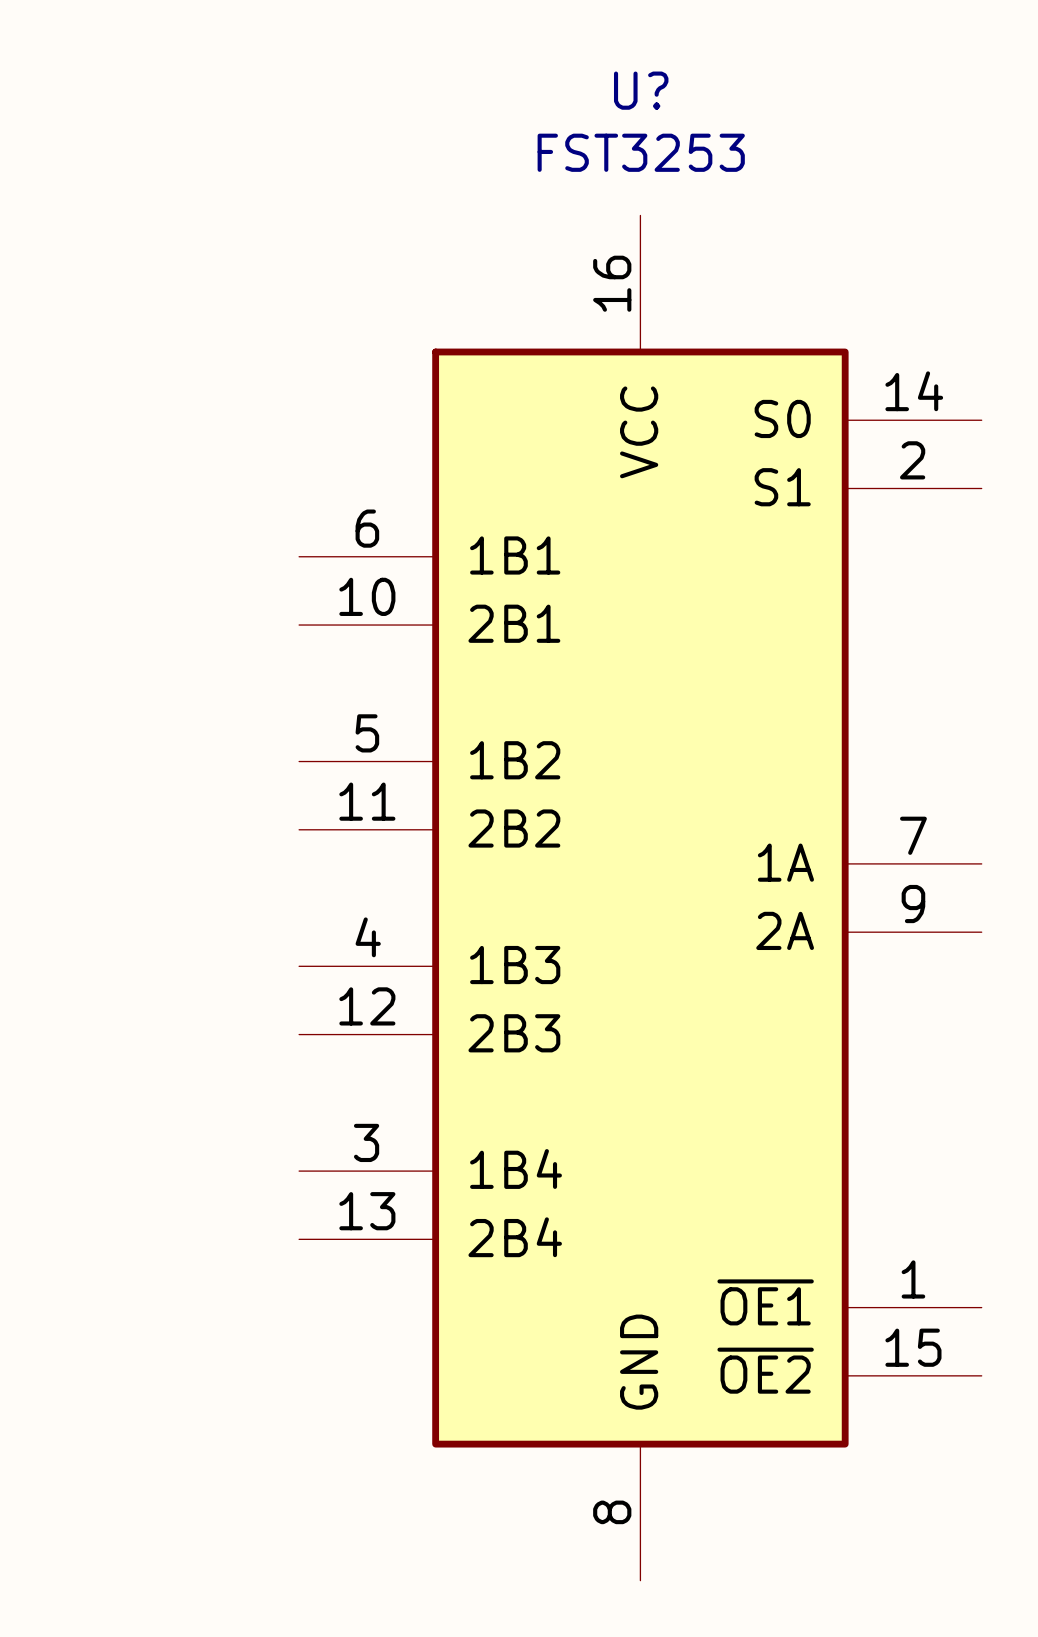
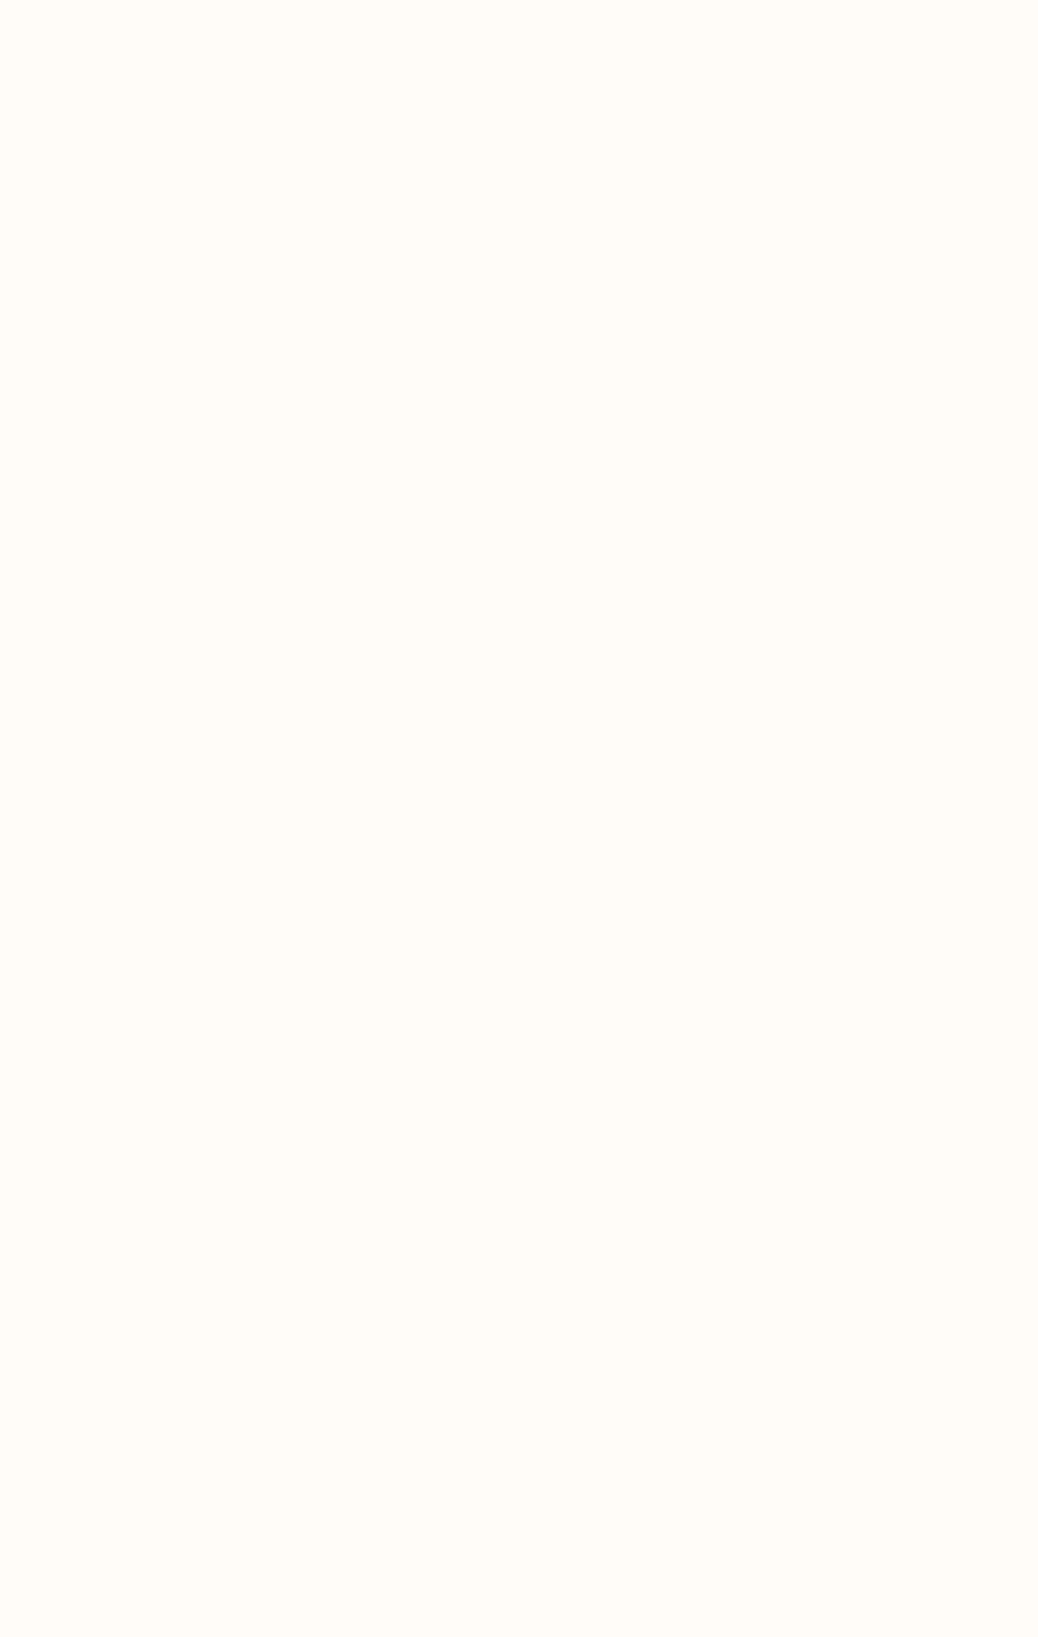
U?: FST3253 (640, 898) -> none

